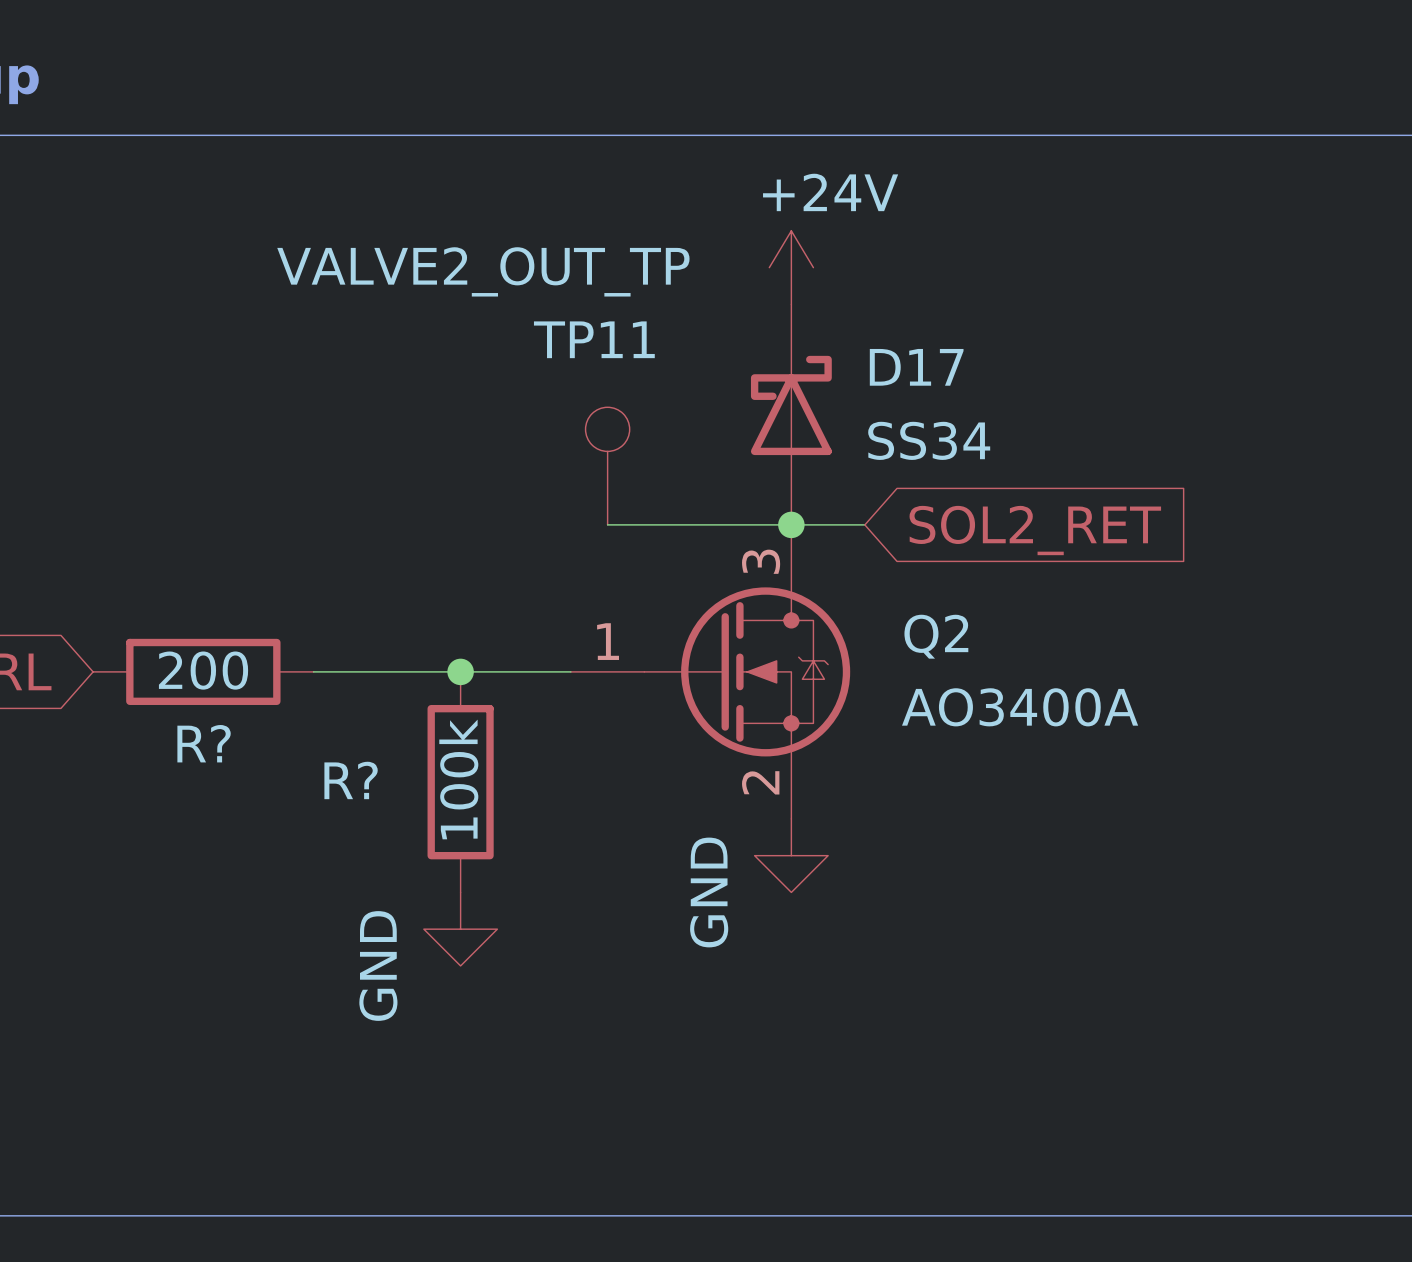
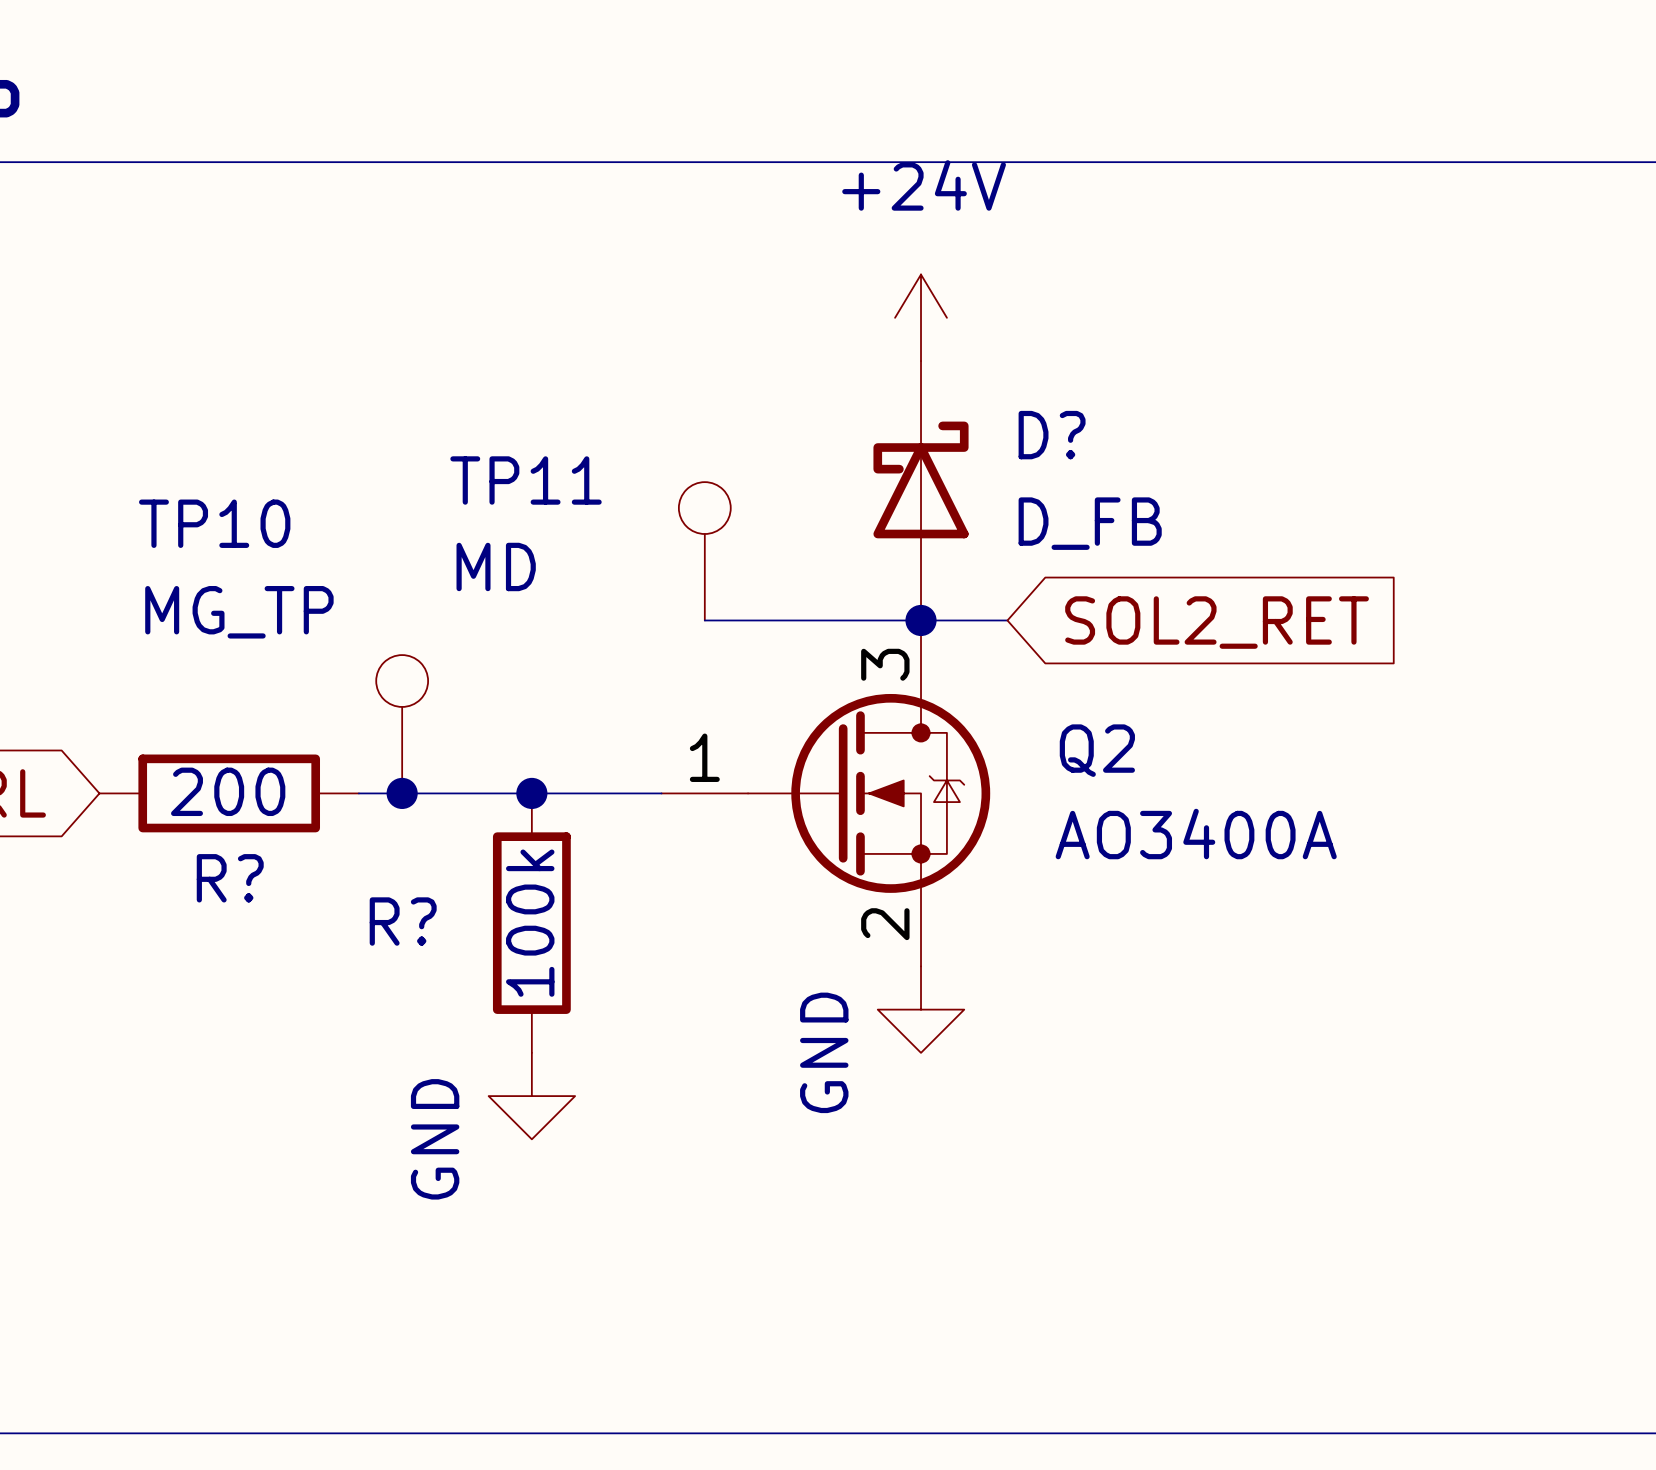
power symbol text position: +24V (830, 192) -> +24V (924, 185)
TP11 value: VALVE2_OUT_TP (483, 271) -> MD (496, 566)
TP11 name position: TP11 (594, 339) -> TP11 (526, 480)
D17 name: D17 (916, 367) -> D? (1052, 435)
D17 value: SS34 (929, 440) -> D_FB (1090, 523)
TP10: none -> MG_TP (402, 724)
junction: none -> (402, 793)

